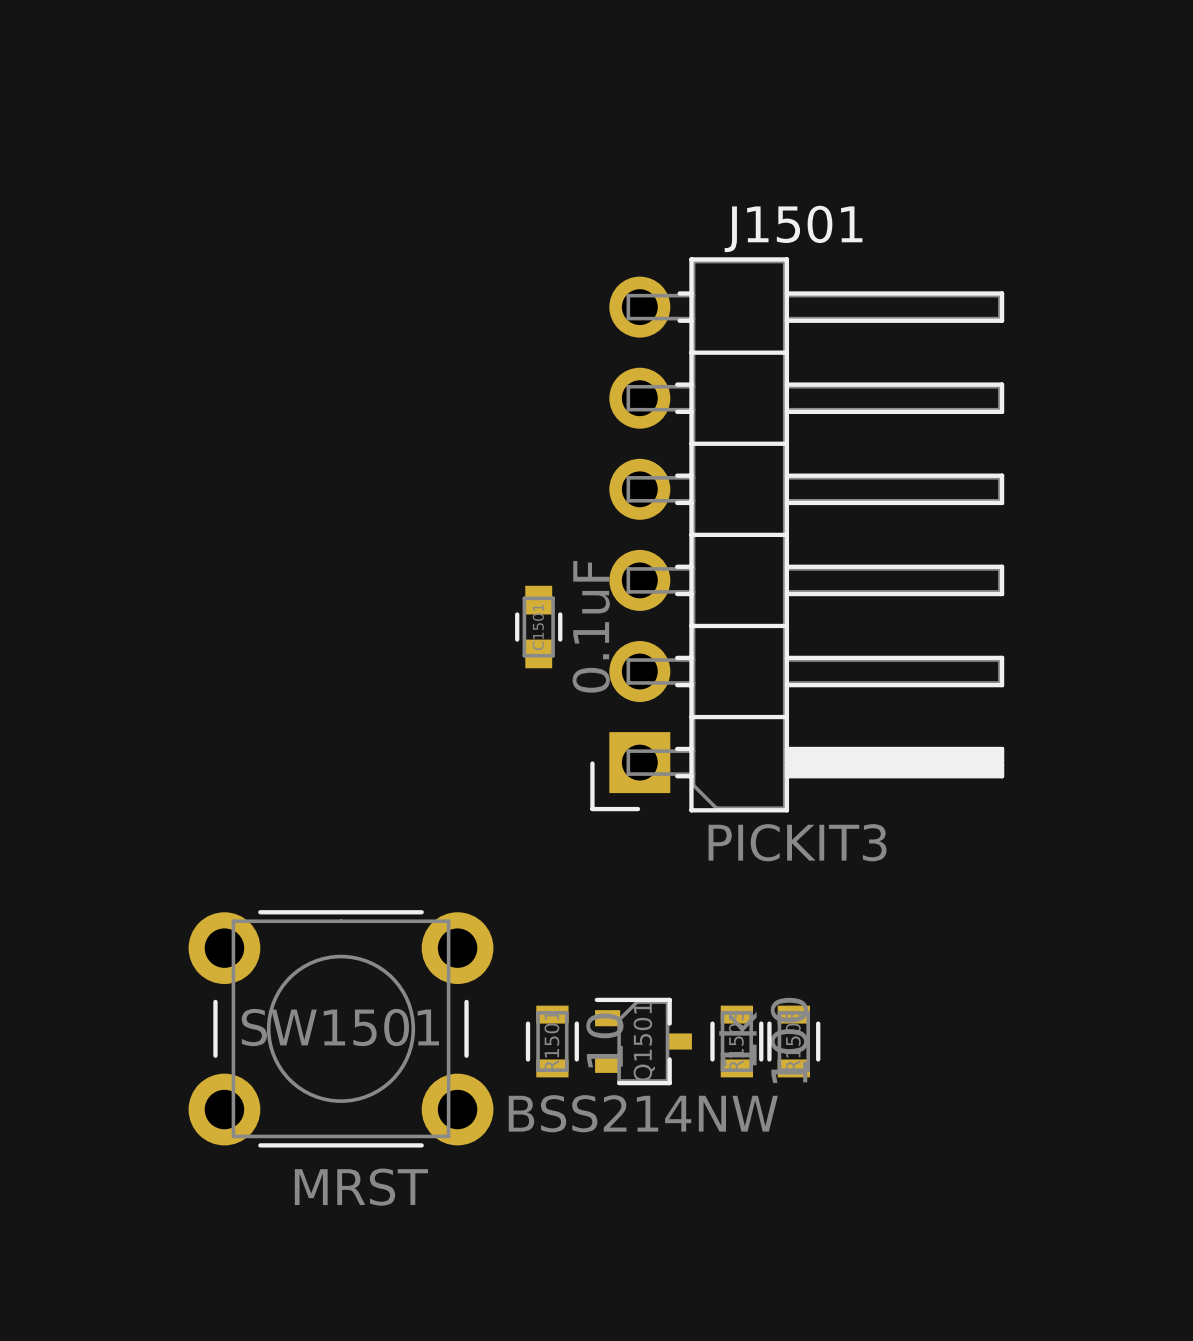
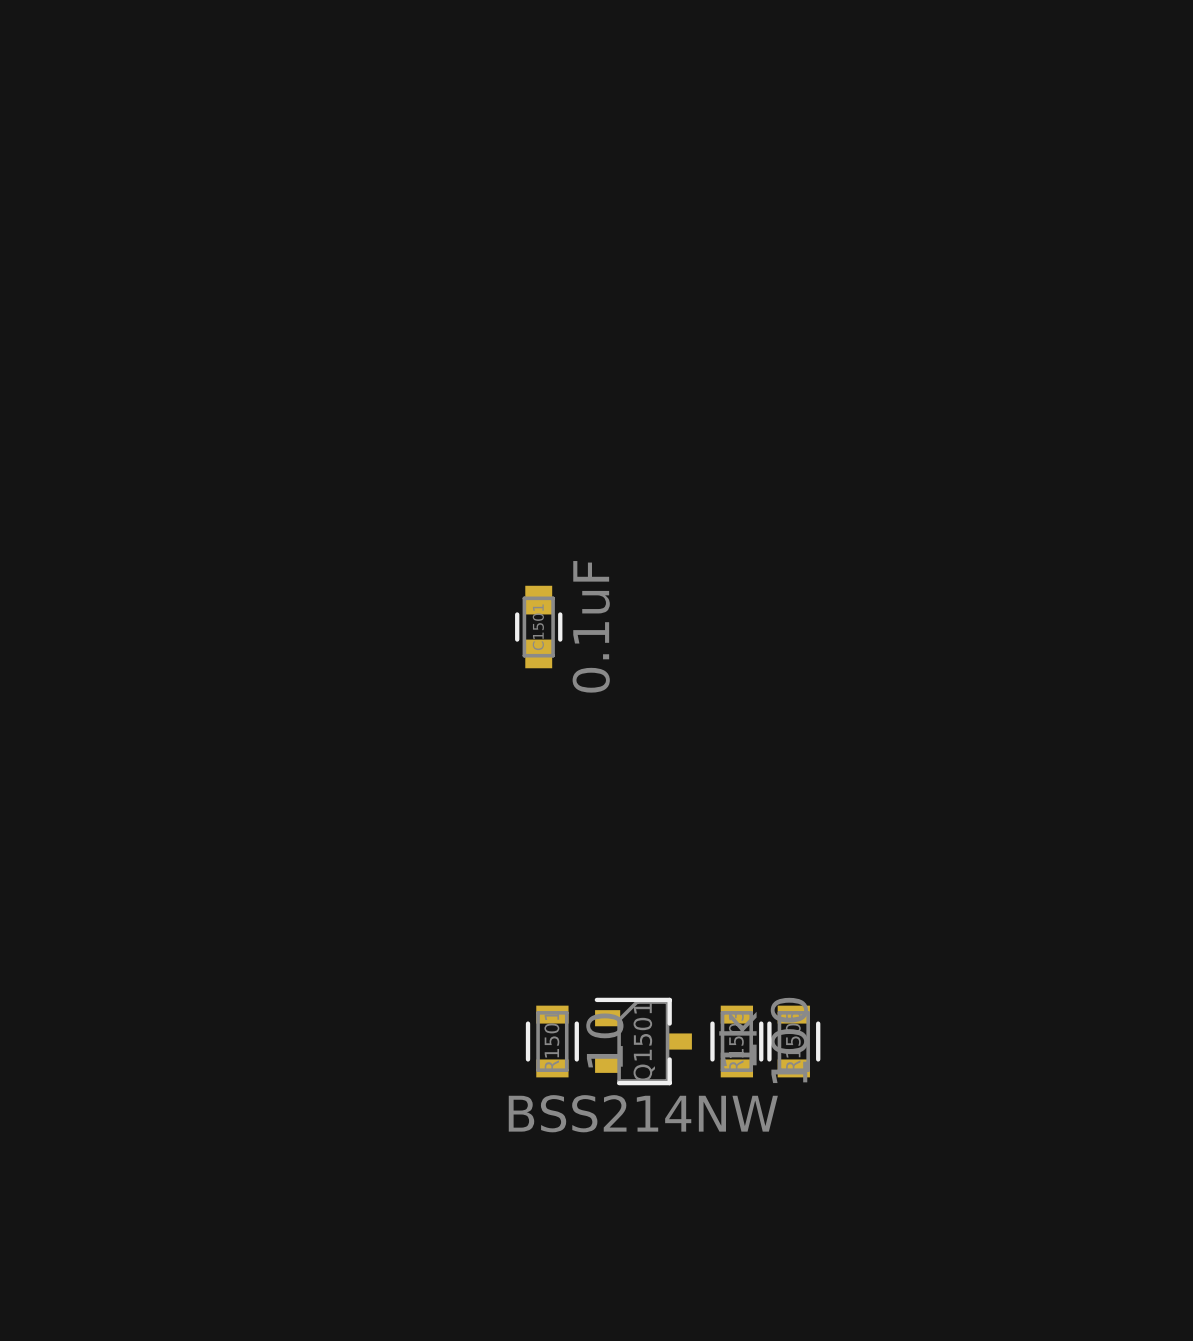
J1501: PICKIT3 (797, 534) -> none
SW1501: MRST (341, 1028) -> none

